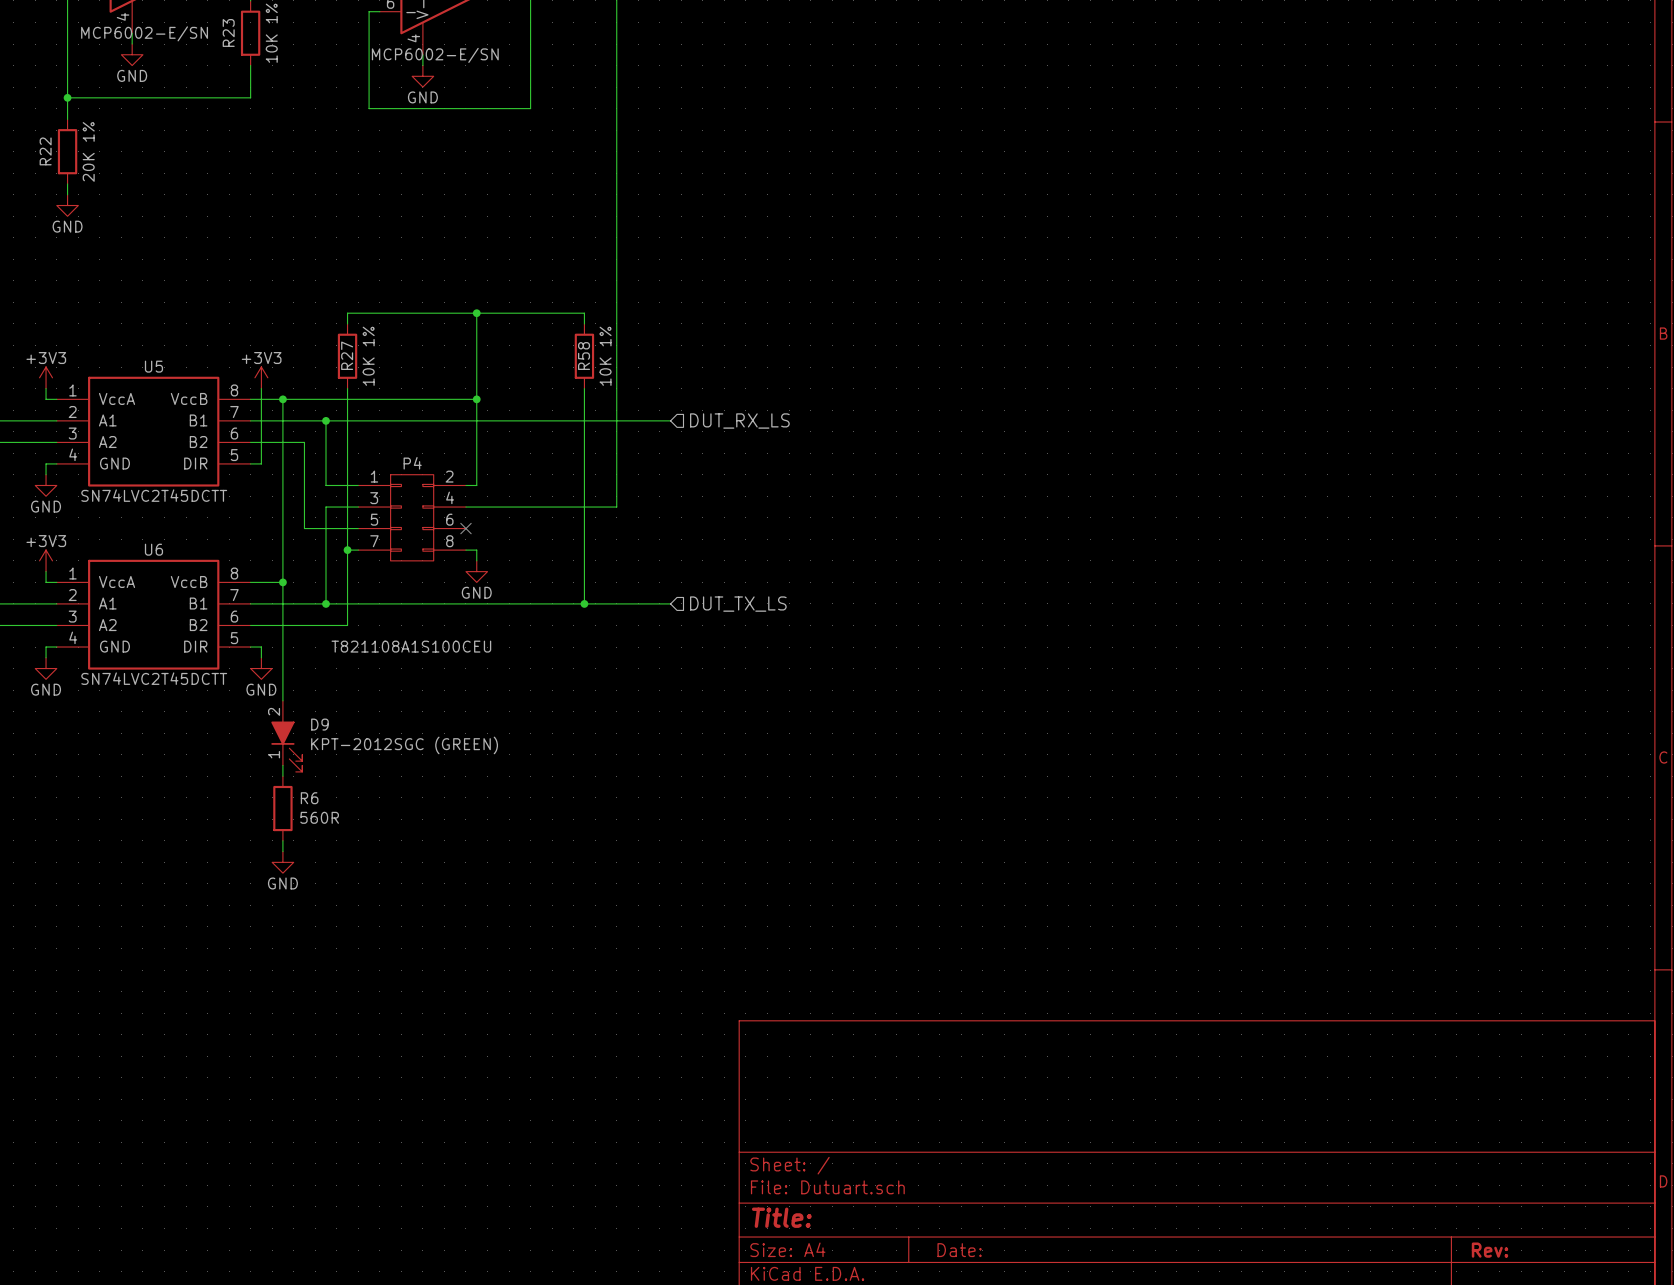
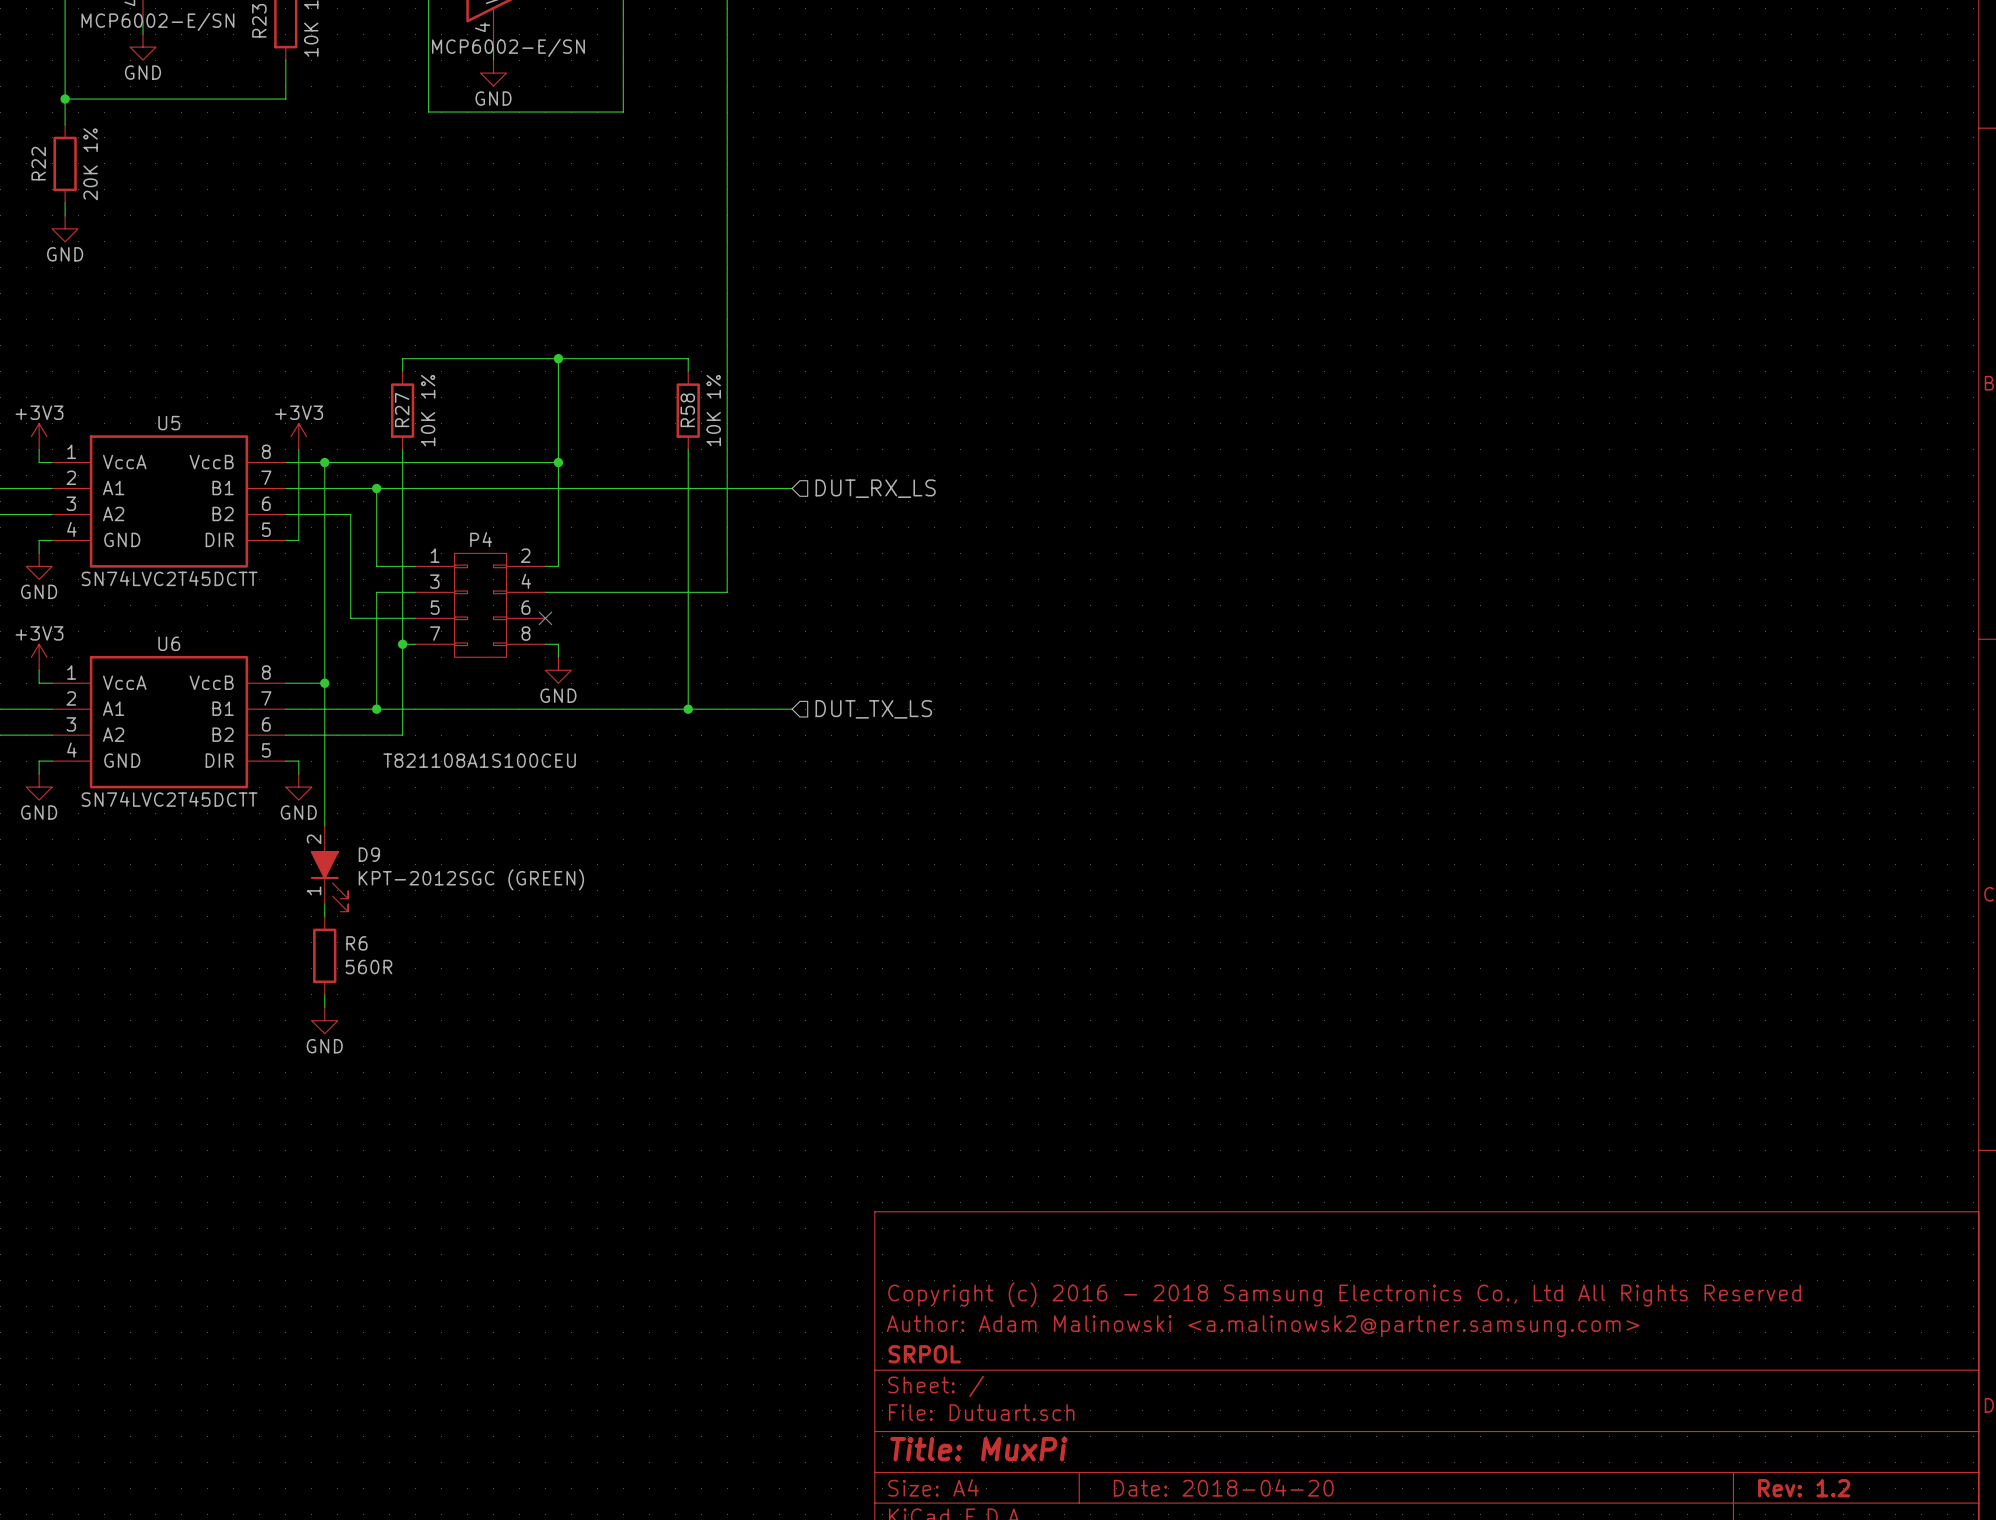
title block: none -> Copyright (c) 2016 - 2018 Samsung Electronics Co., Ltd All Rights Reserved (1344, 1294)
title block: none -> Author: Adam Malinowski <a.malinowsk2@partner.samsung.com> (1263, 1326)
title block: none -> SRPOL (924, 1354)
title block: Title: (781, 1217) -> Title: MuxPi (978, 1449)
title block: Date: (959, 1250) -> Date: 2018-04-20 (1223, 1487)
title block: Rev: (1490, 1250) -> Rev: 1.2 (1804, 1488)

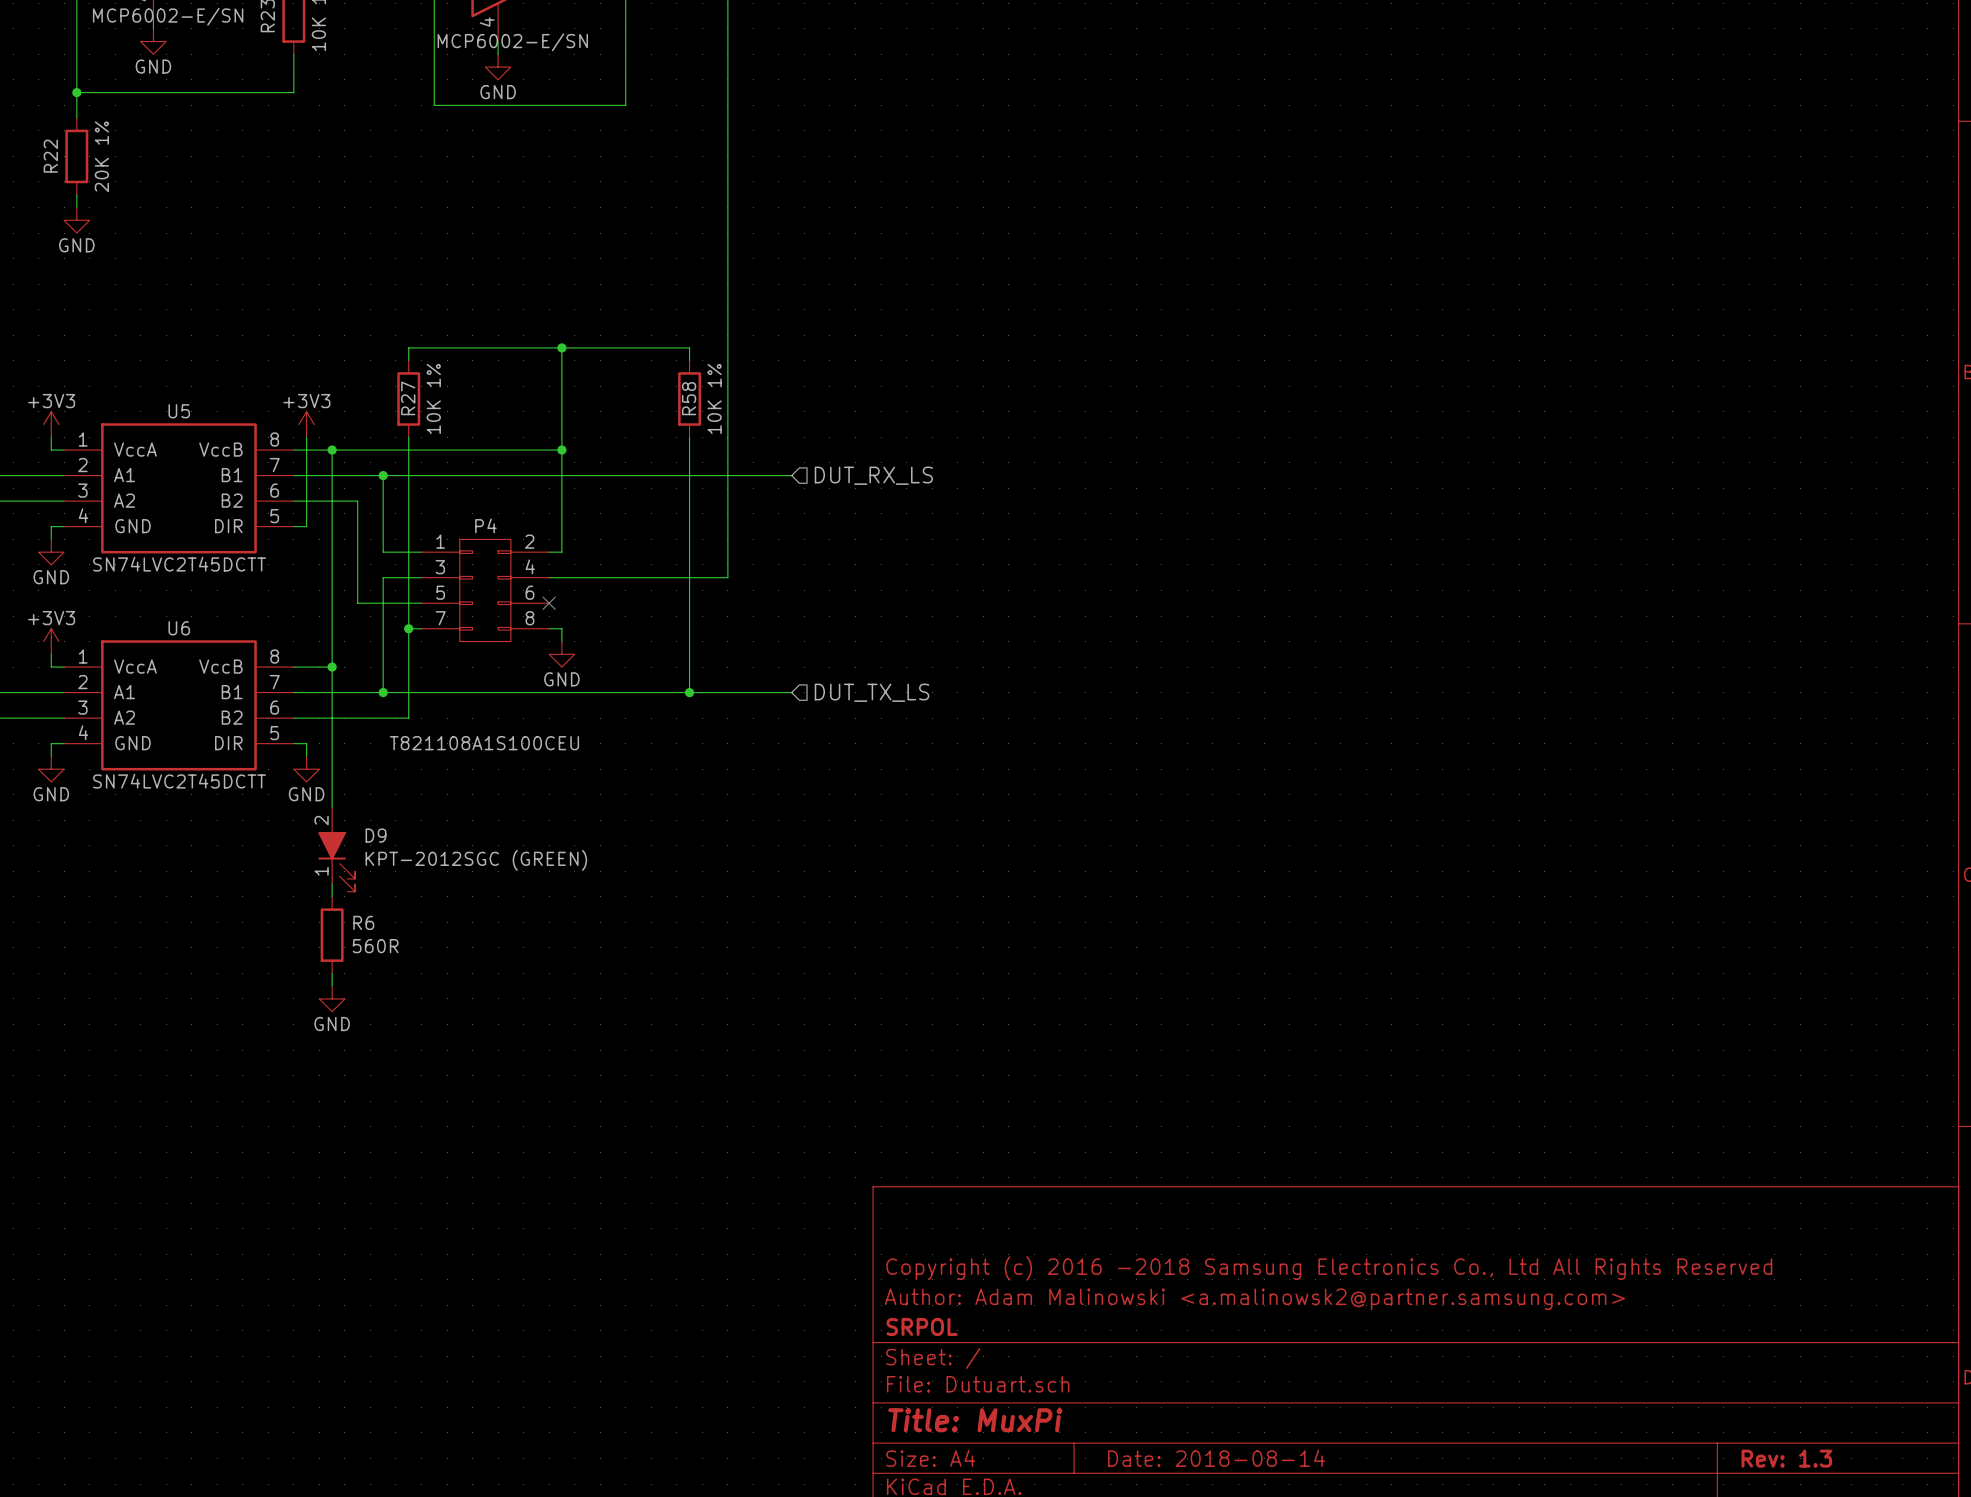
title block: Copyright (c) 2016 - 2018 Samsung Electronics Co., Ltd All Rights Reserved (1344, 1294) -> Copyright (c) 2016 -2018 Samsung Electronics Co., Ltd All Rights Reserved (1329, 1268)
title block: Date: 2018-04-20 (1223, 1487) -> Date: 2018-08-14 (1216, 1458)
title block: Rev: 1.2 (1804, 1488) -> Rev: 1.3 (1786, 1458)

